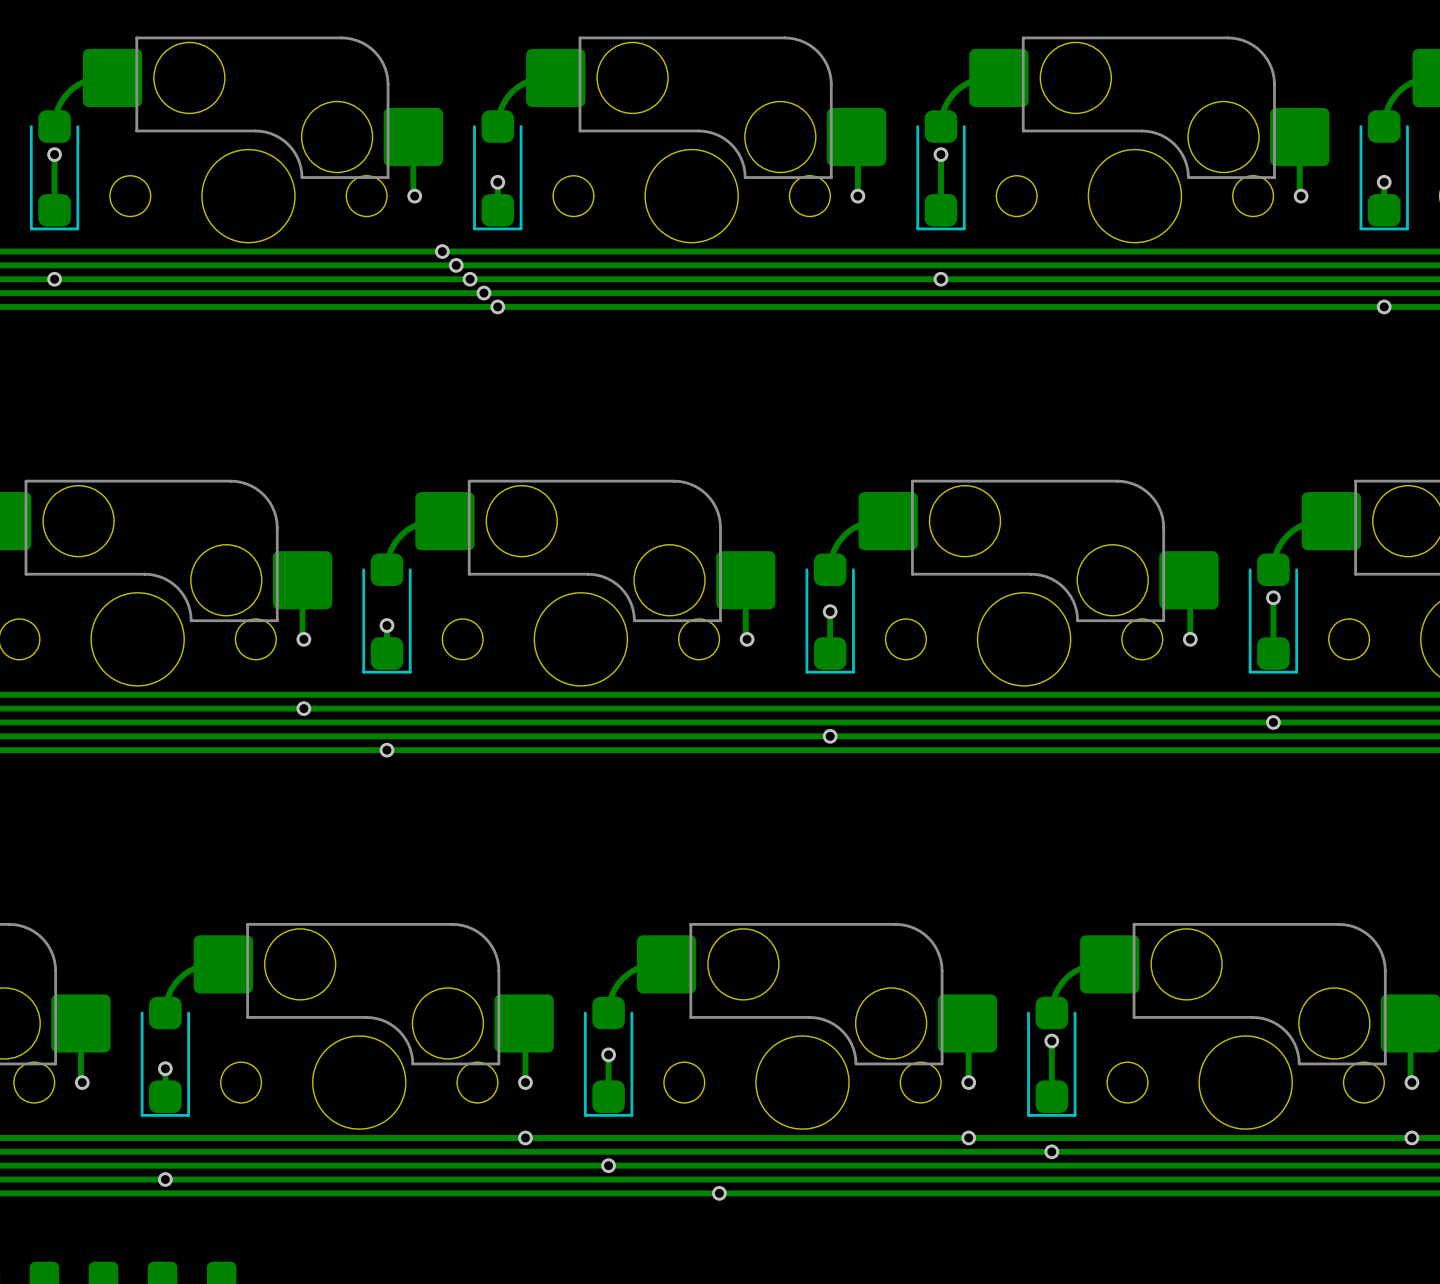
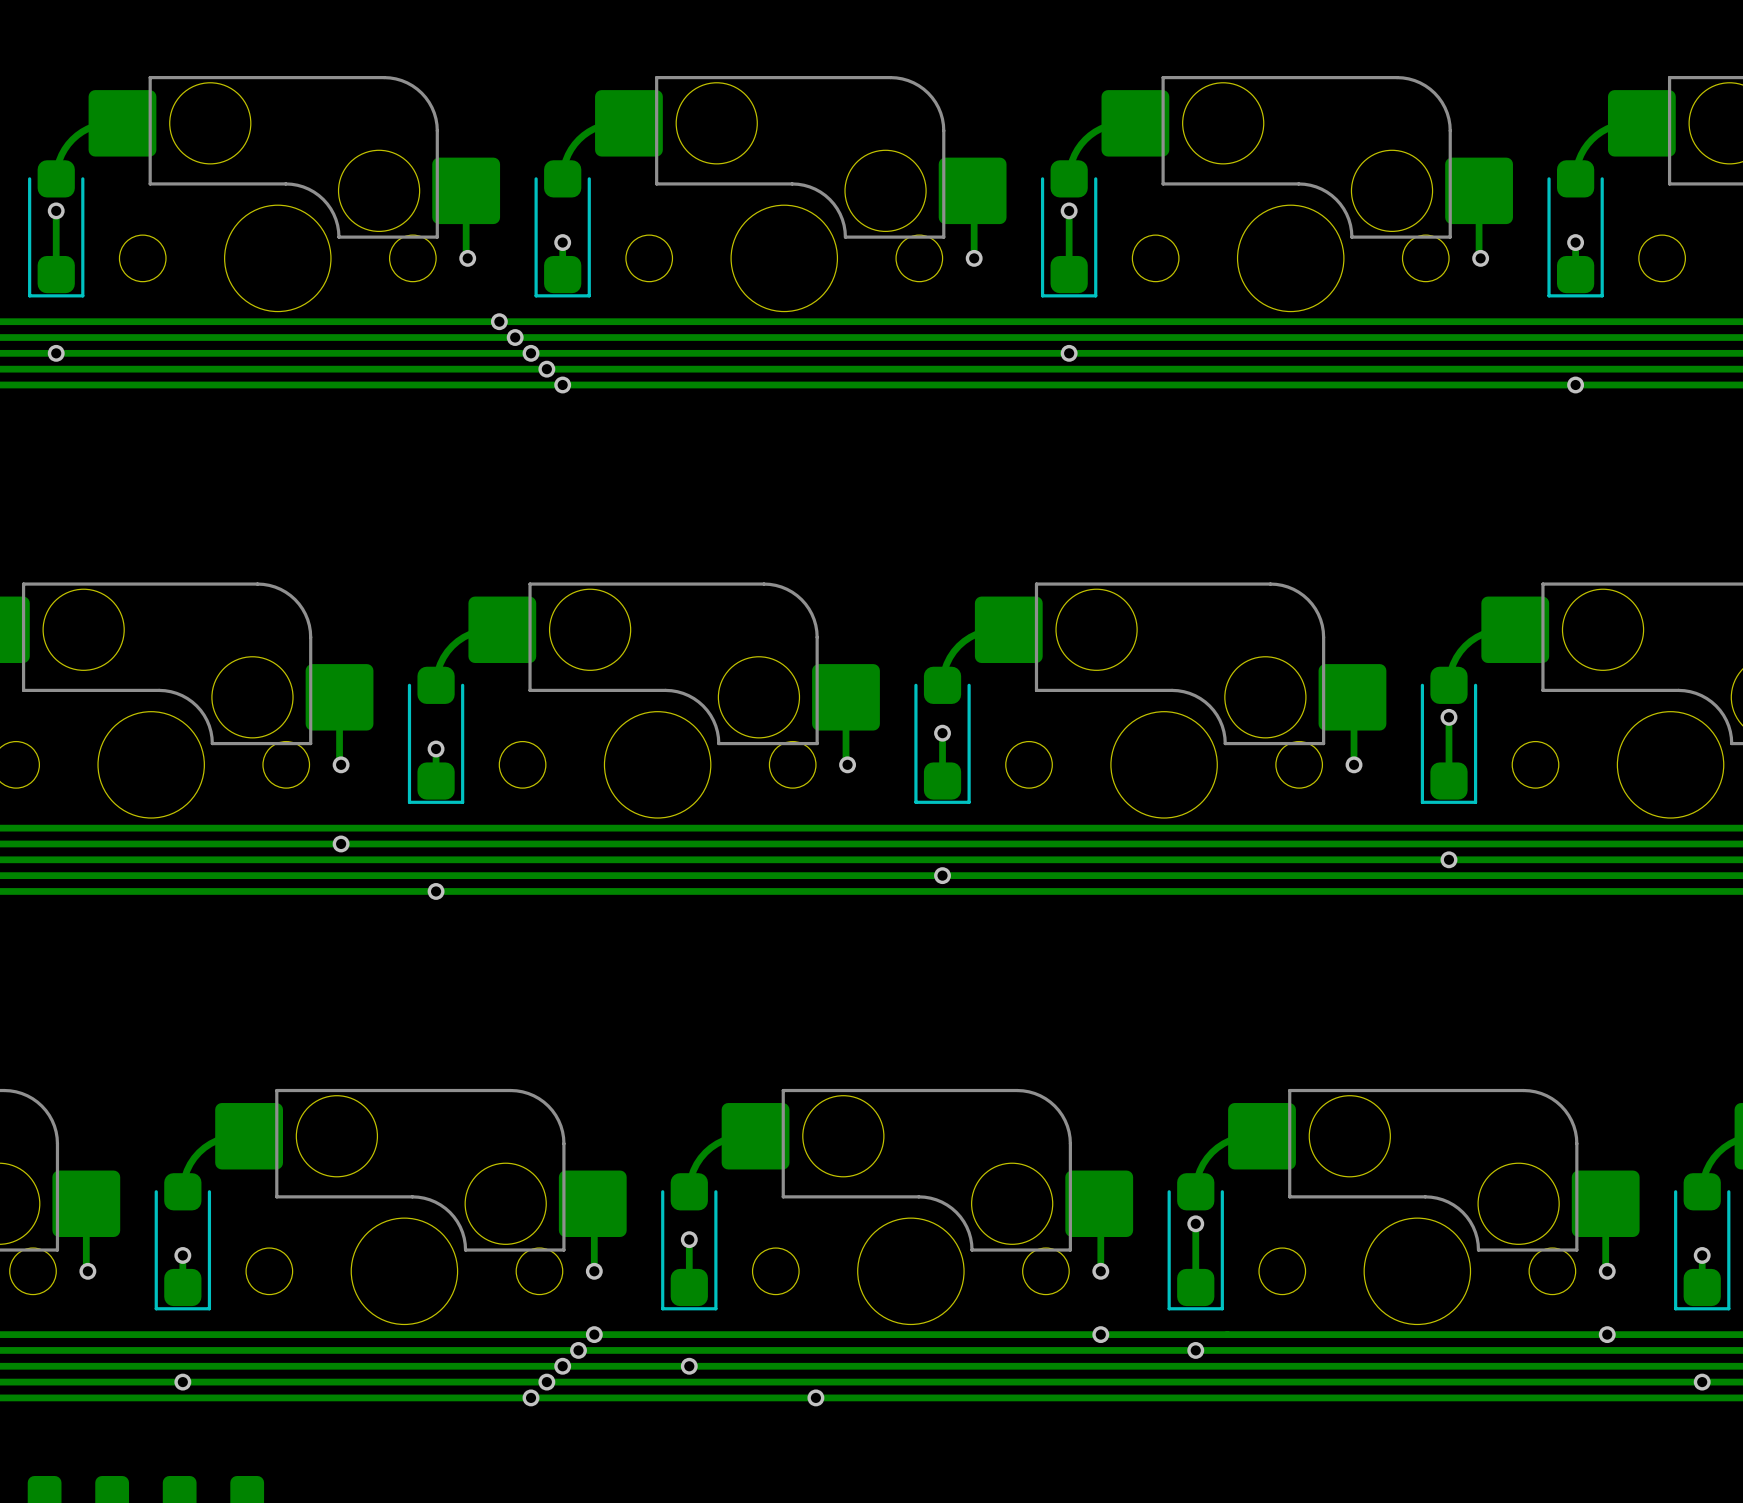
via: none -> (578, 1350)
via: none -> (562, 1366)
via: none -> (546, 1382)
via: none -> (531, 1397)

